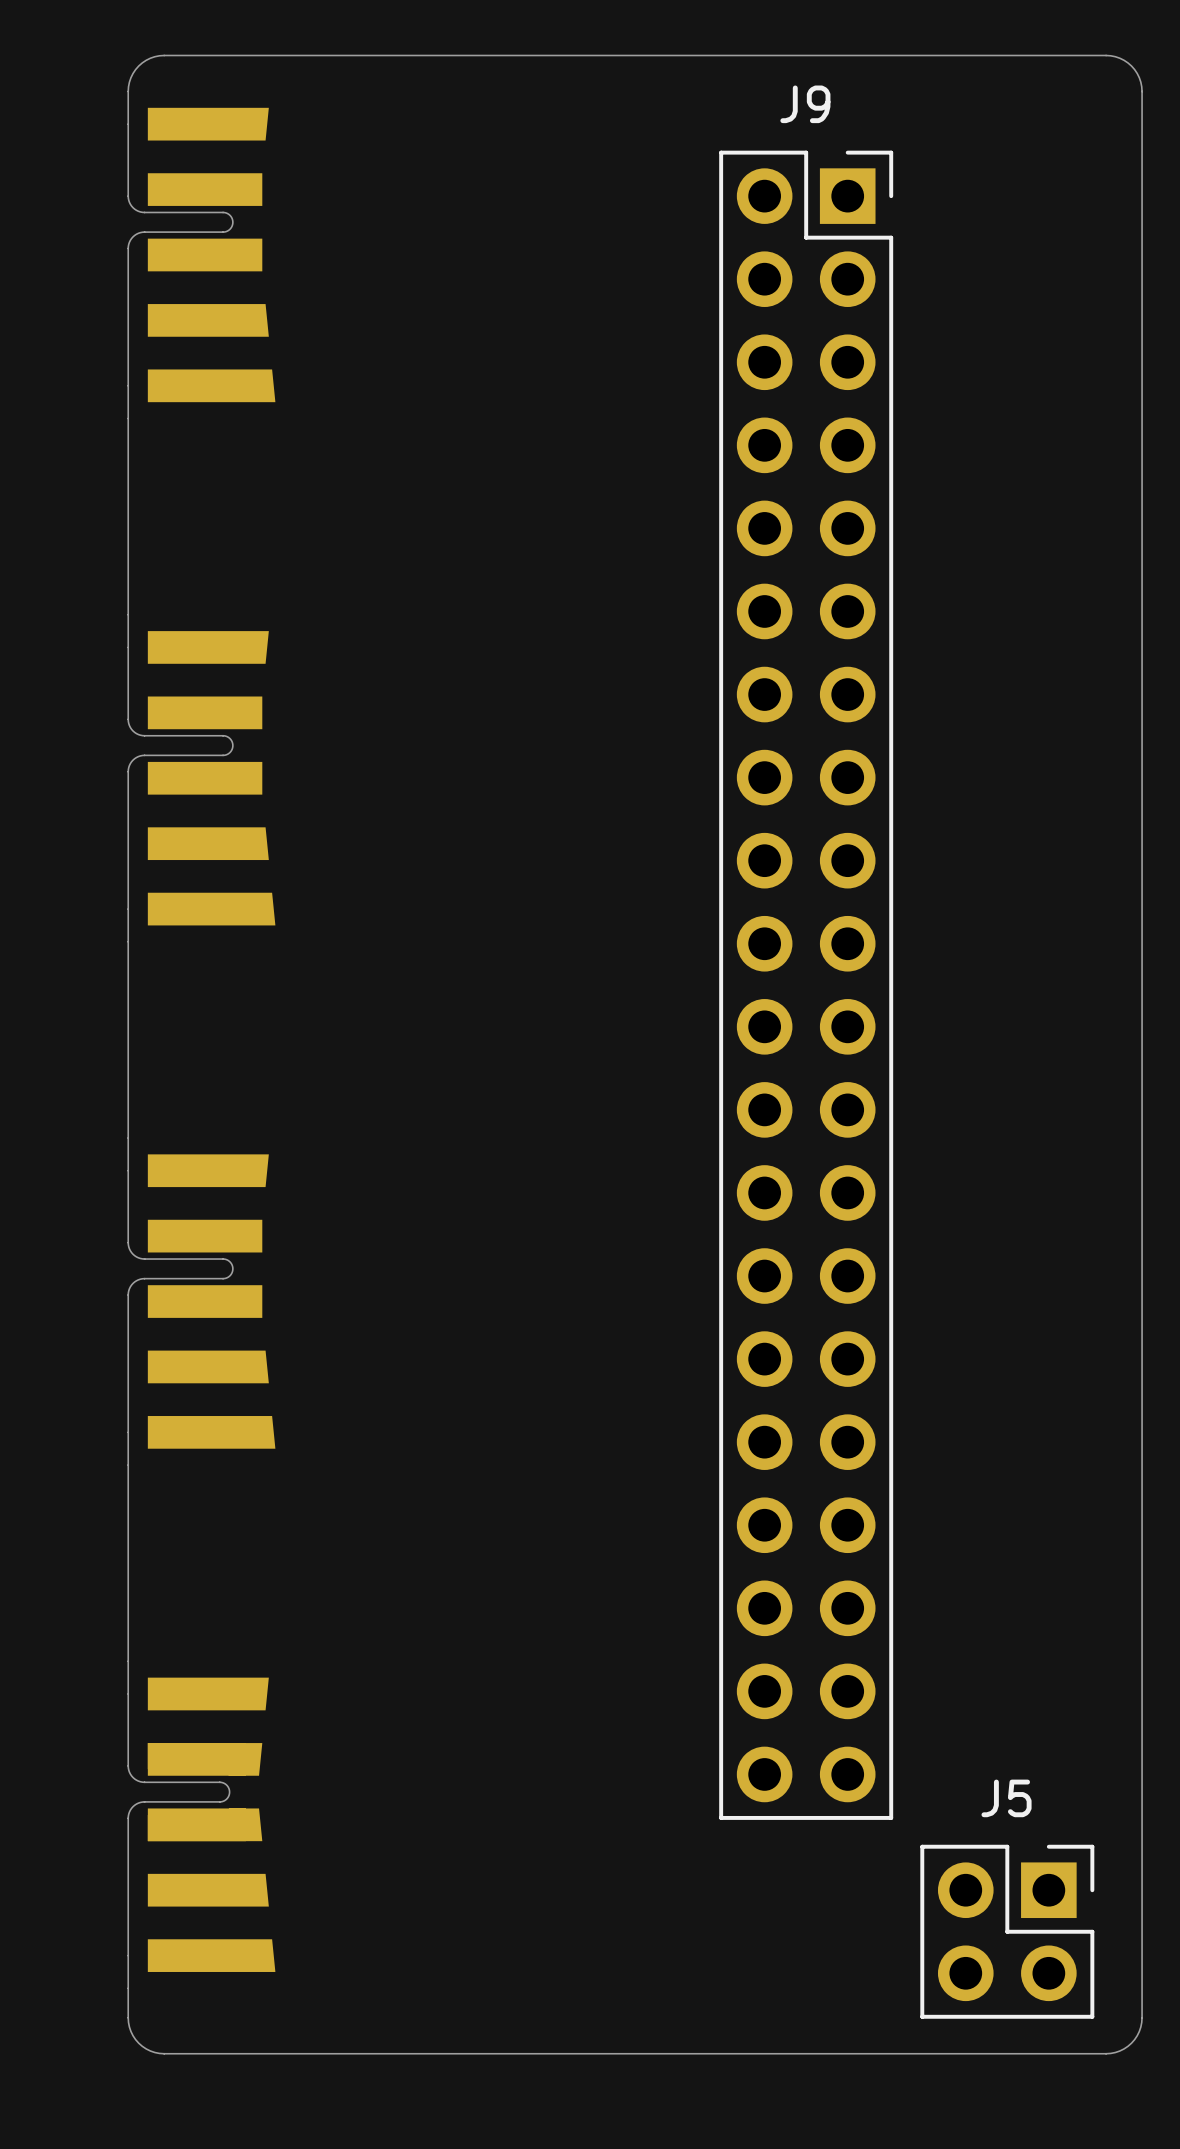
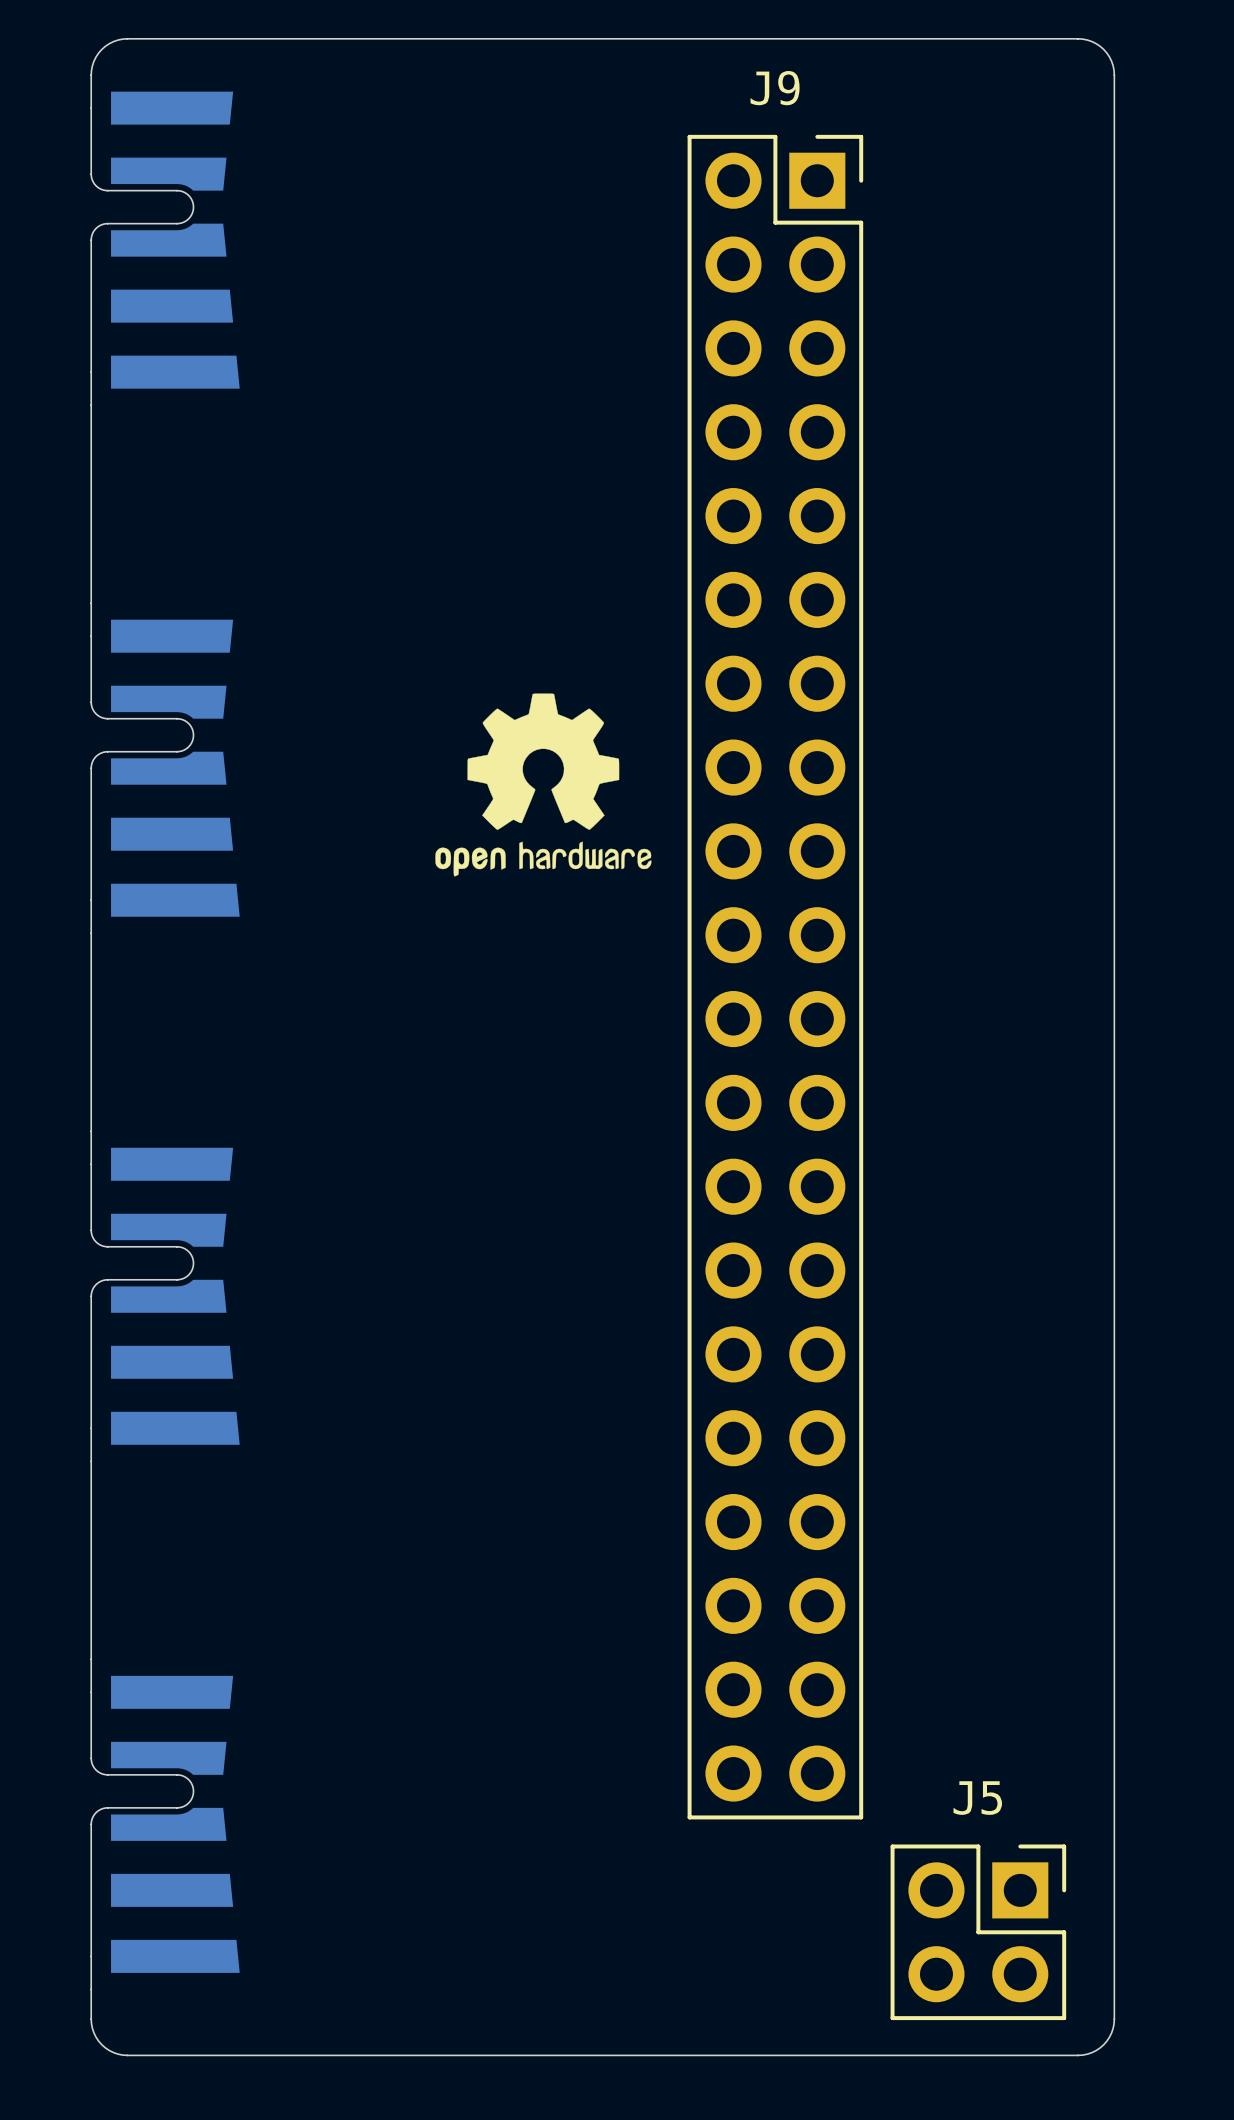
part footprint: [127, 107, 276, 403] -> [90, 91, 240, 389]
part footprint: [127, 631, 276, 926] -> [90, 619, 240, 917]
drawing: none -> [435, 693, 652, 877]
part footprint: [127, 1154, 276, 1449] -> [90, 1147, 240, 1445]
part footprint: [127, 1677, 276, 1972] -> [90, 1675, 240, 1973]

